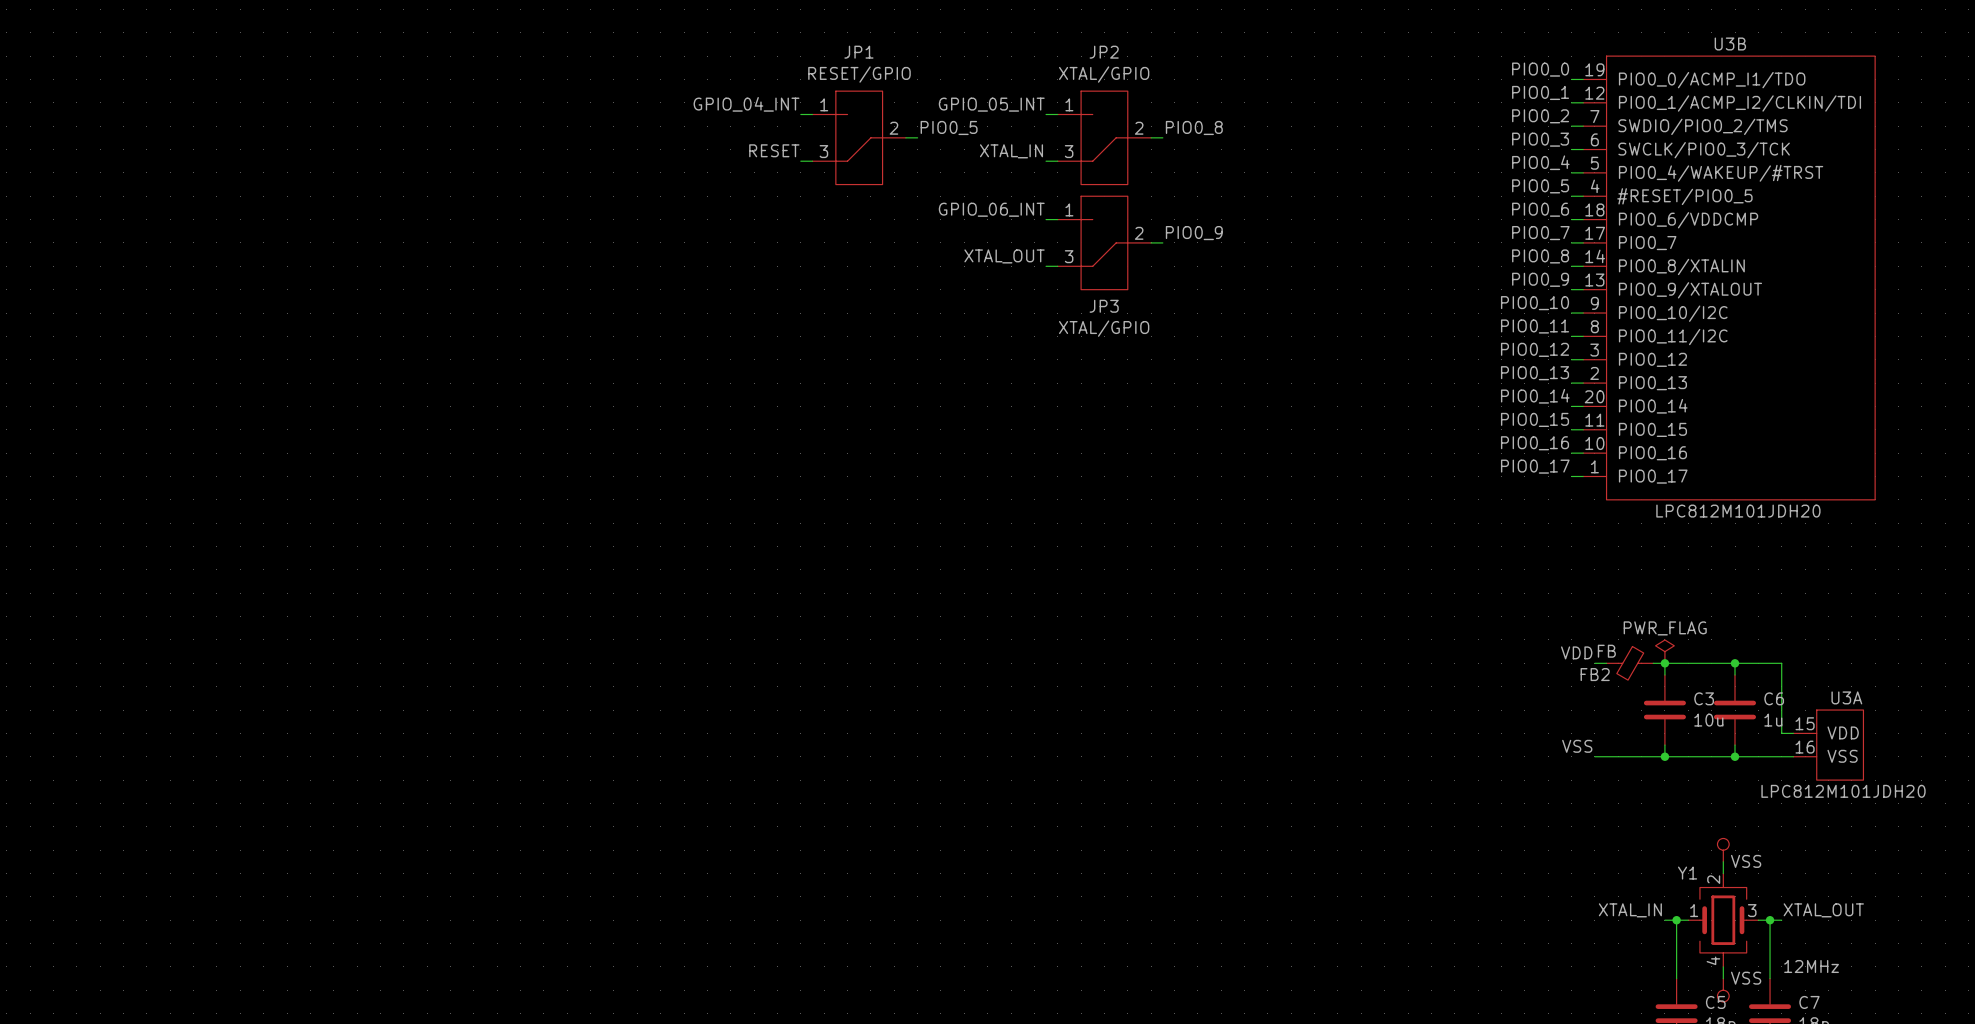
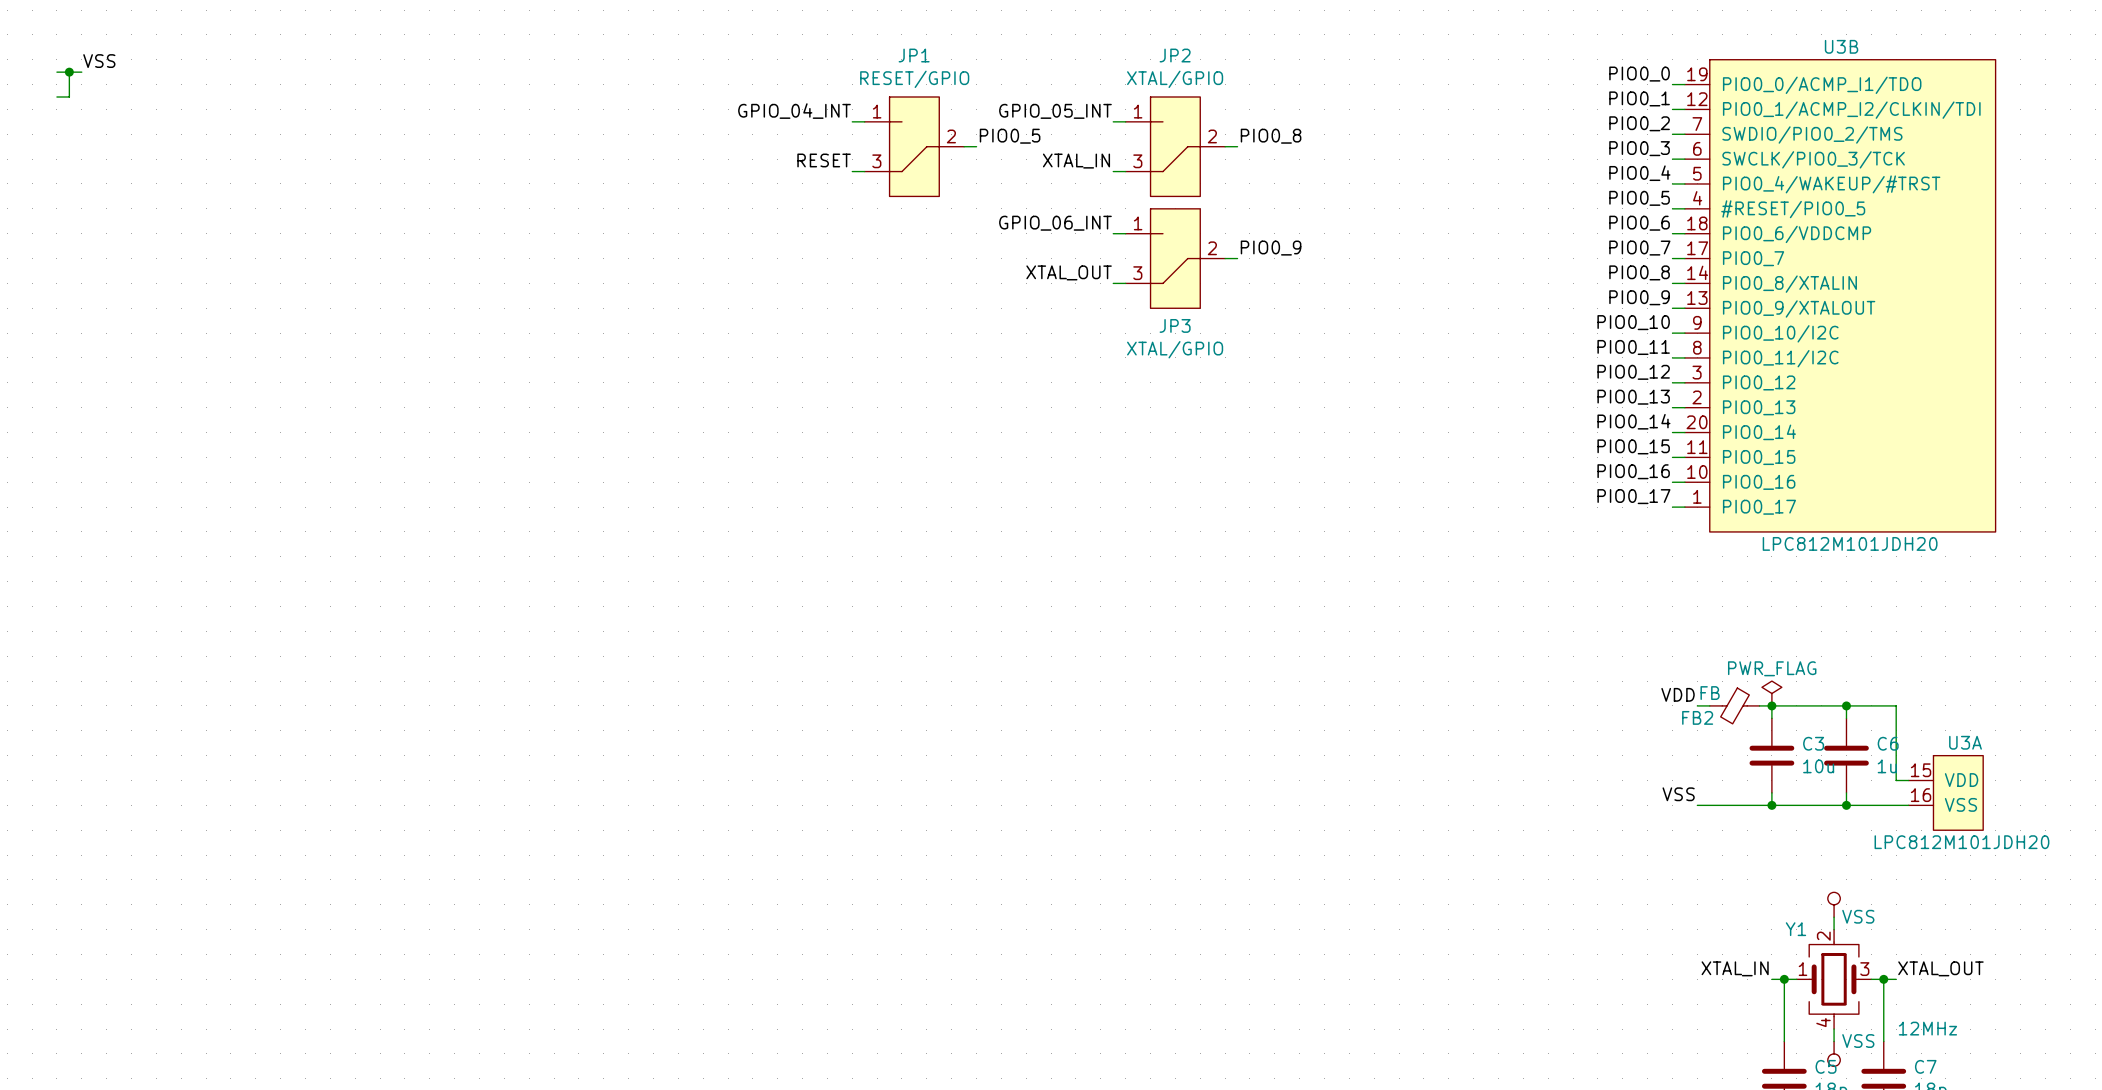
label: none -> VSS (99, 61)
wire: none -> (56, 72) (81, 72)
wire: none -> (69, 72) (69, 97) (56, 97)
junction: none -> (69, 72)

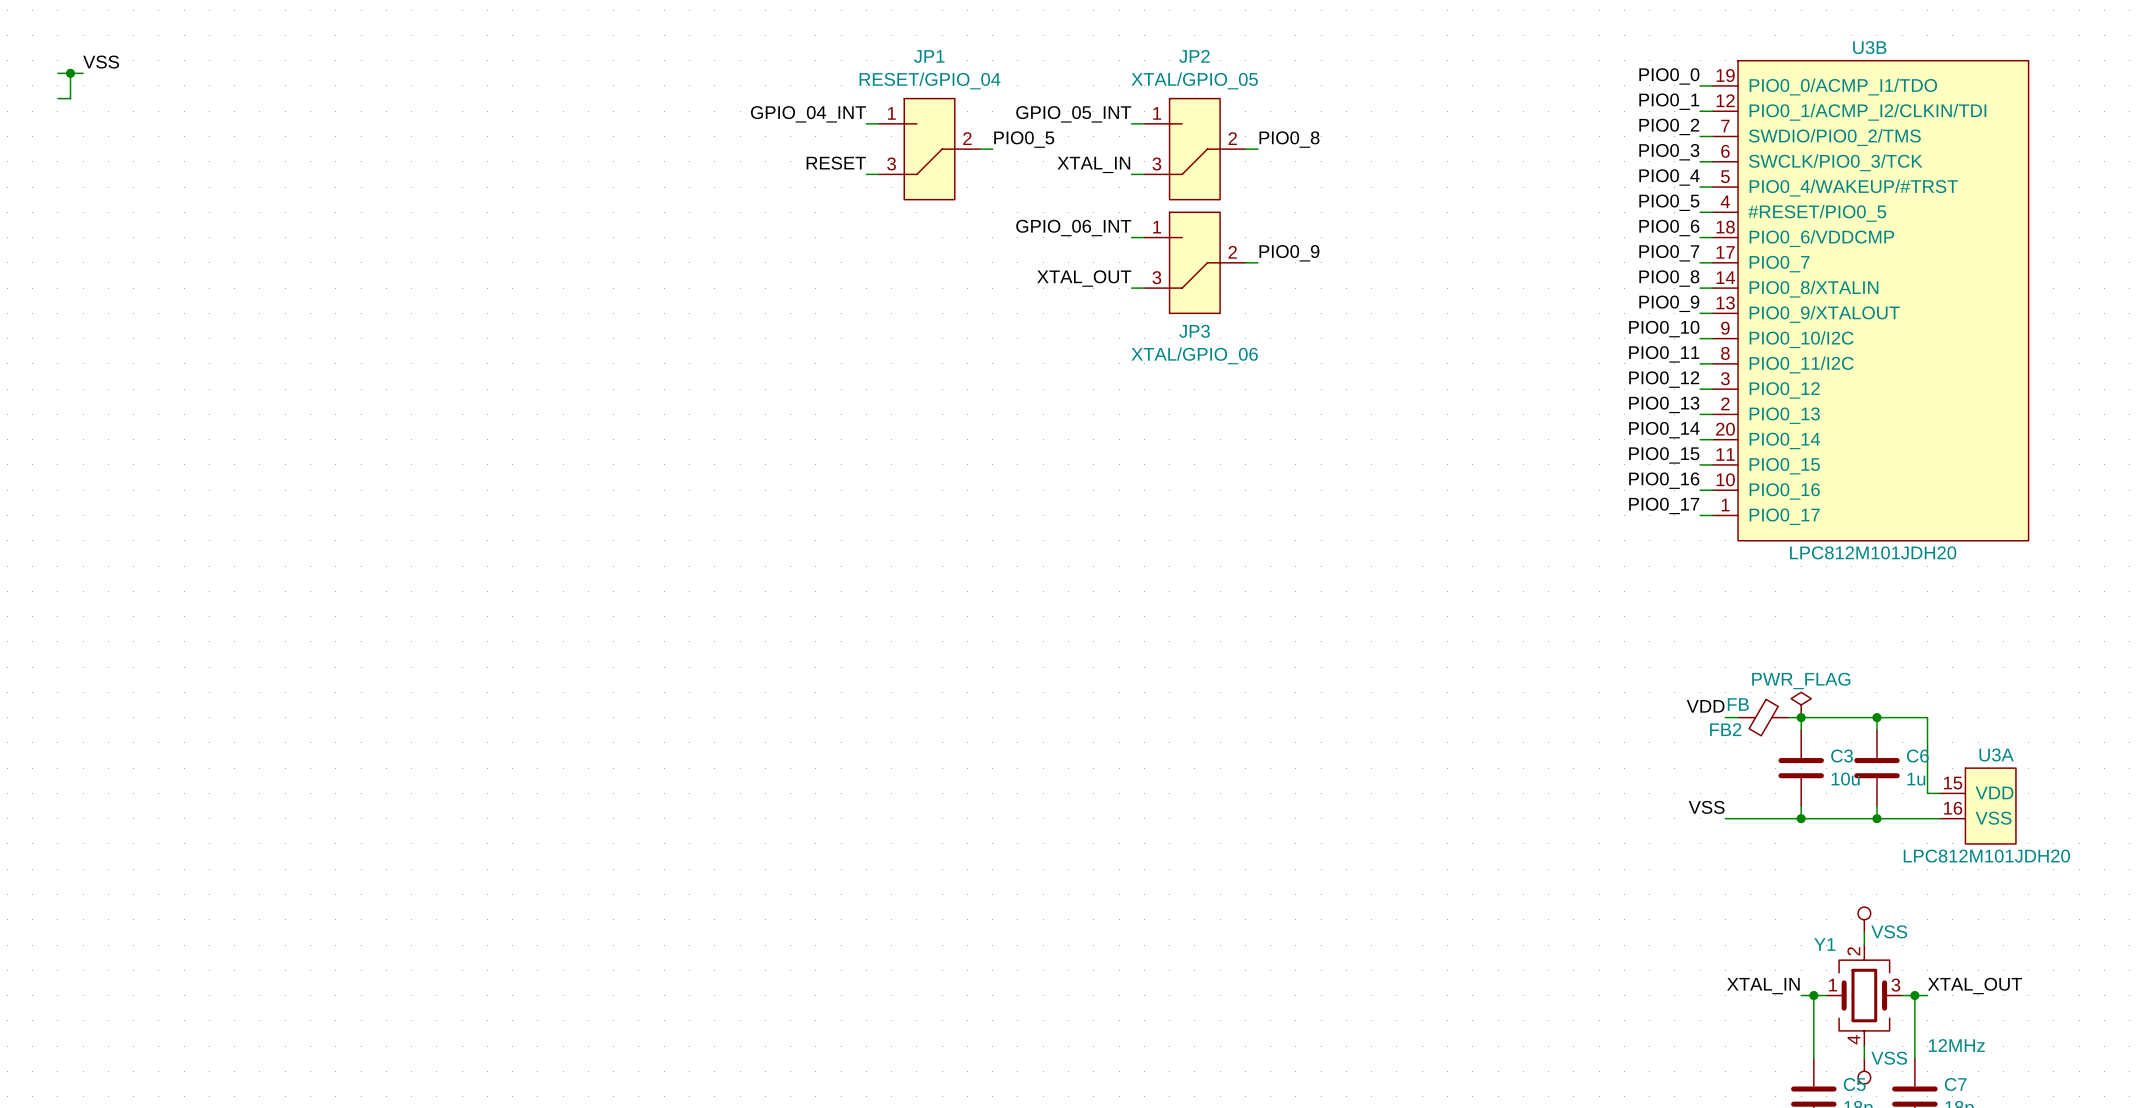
JP1 value: RESET/GPIO (914, 79) -> RESET/GPIO_04 (930, 80)
JP2 value: XTAL/GPIO (1175, 79) -> XTAL/GPIO_05 (1194, 80)
JP3 value: XTAL/GPIO (1175, 349) -> XTAL/GPIO_06 (1194, 355)

